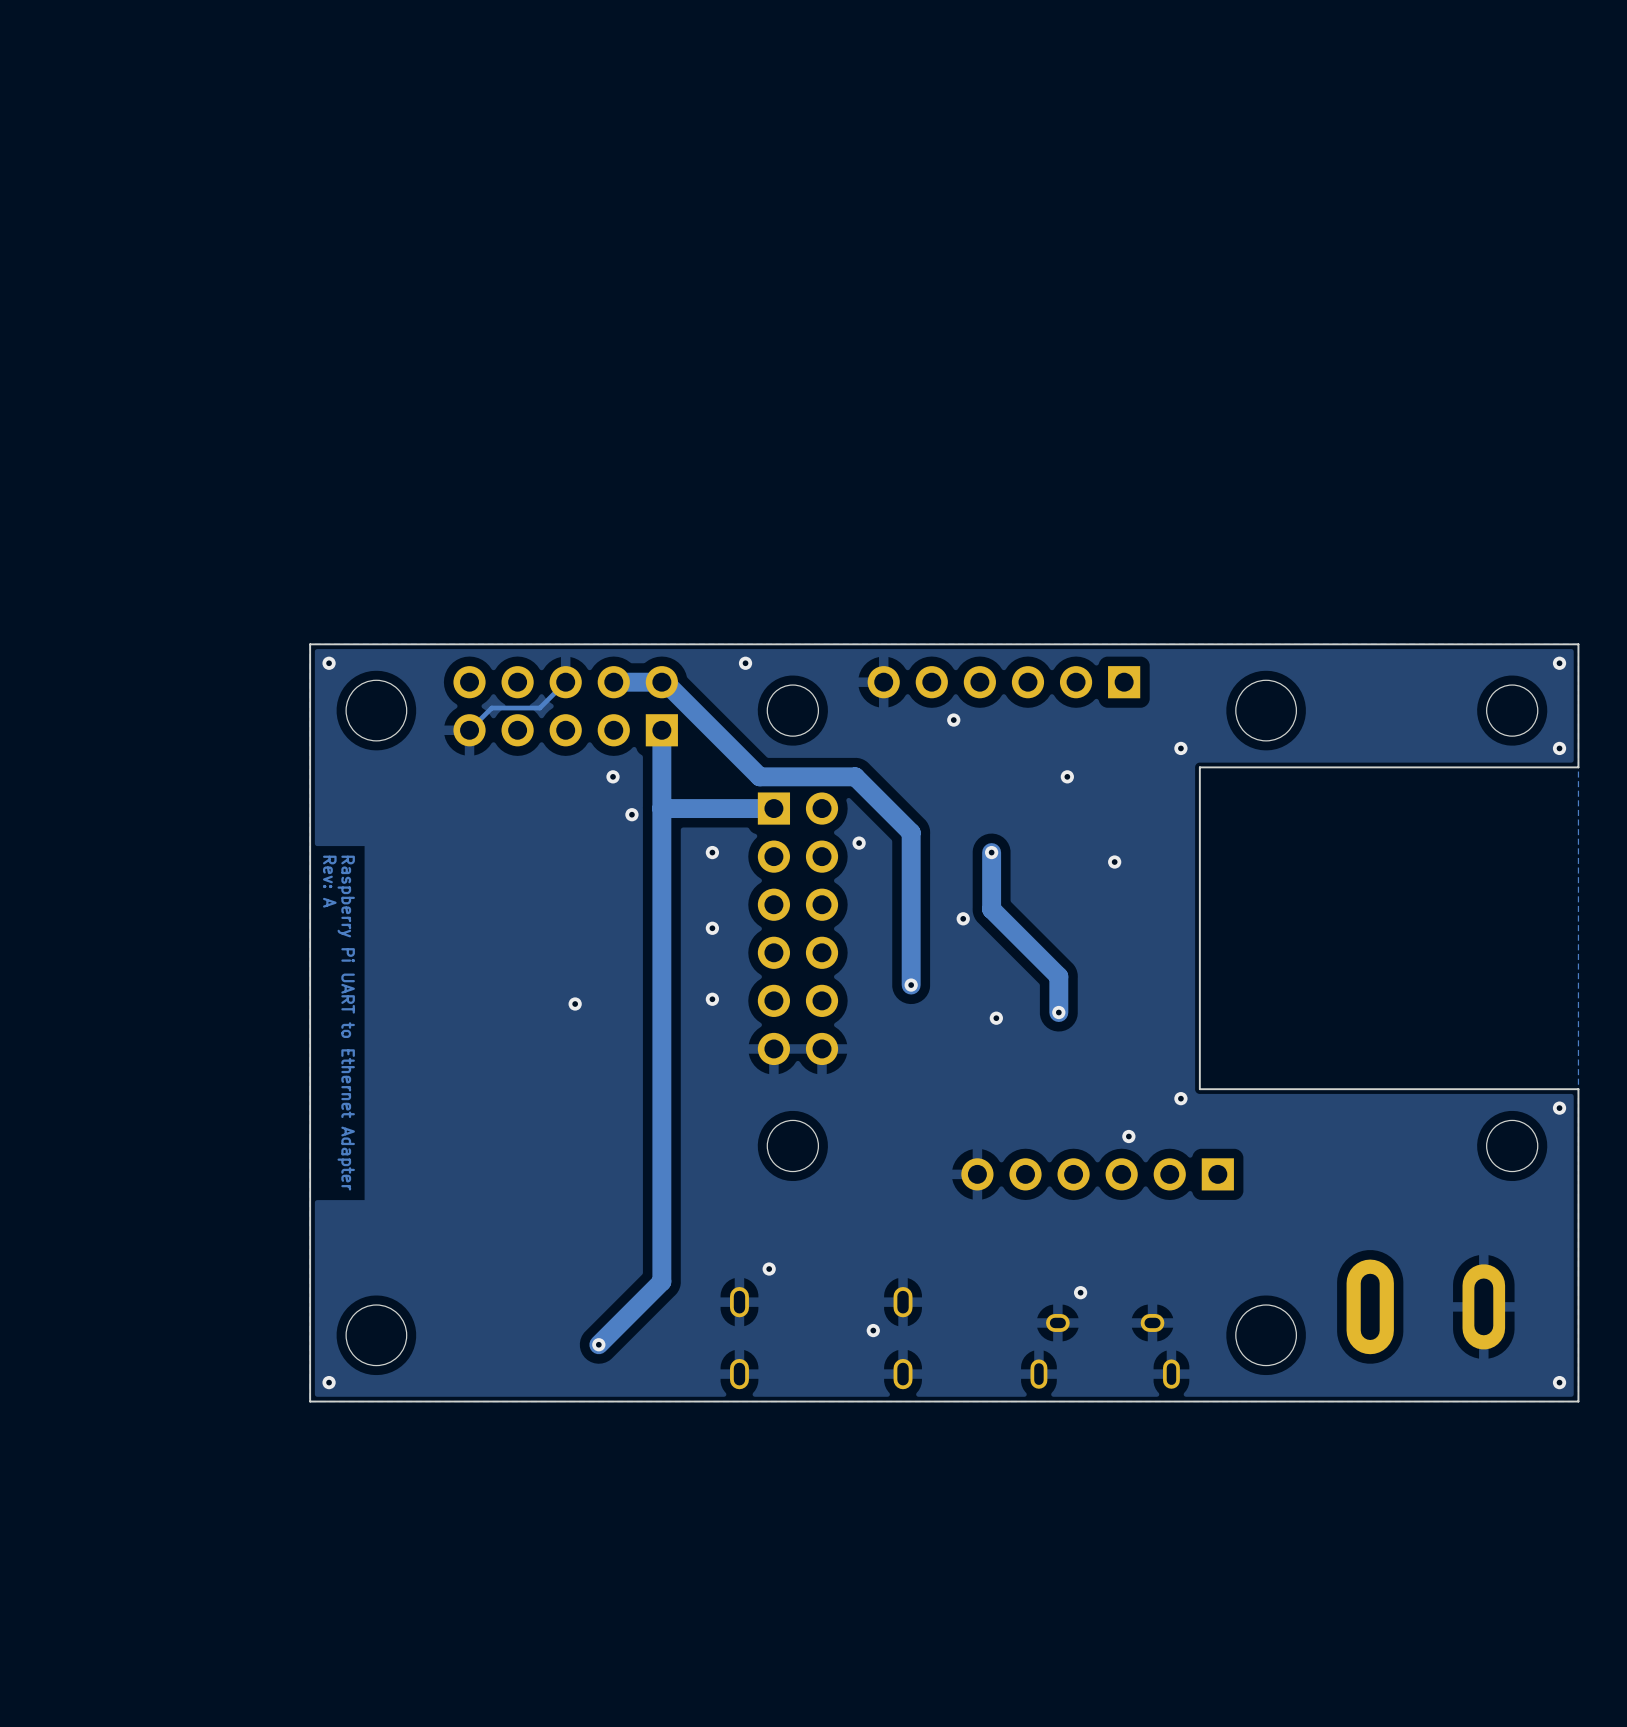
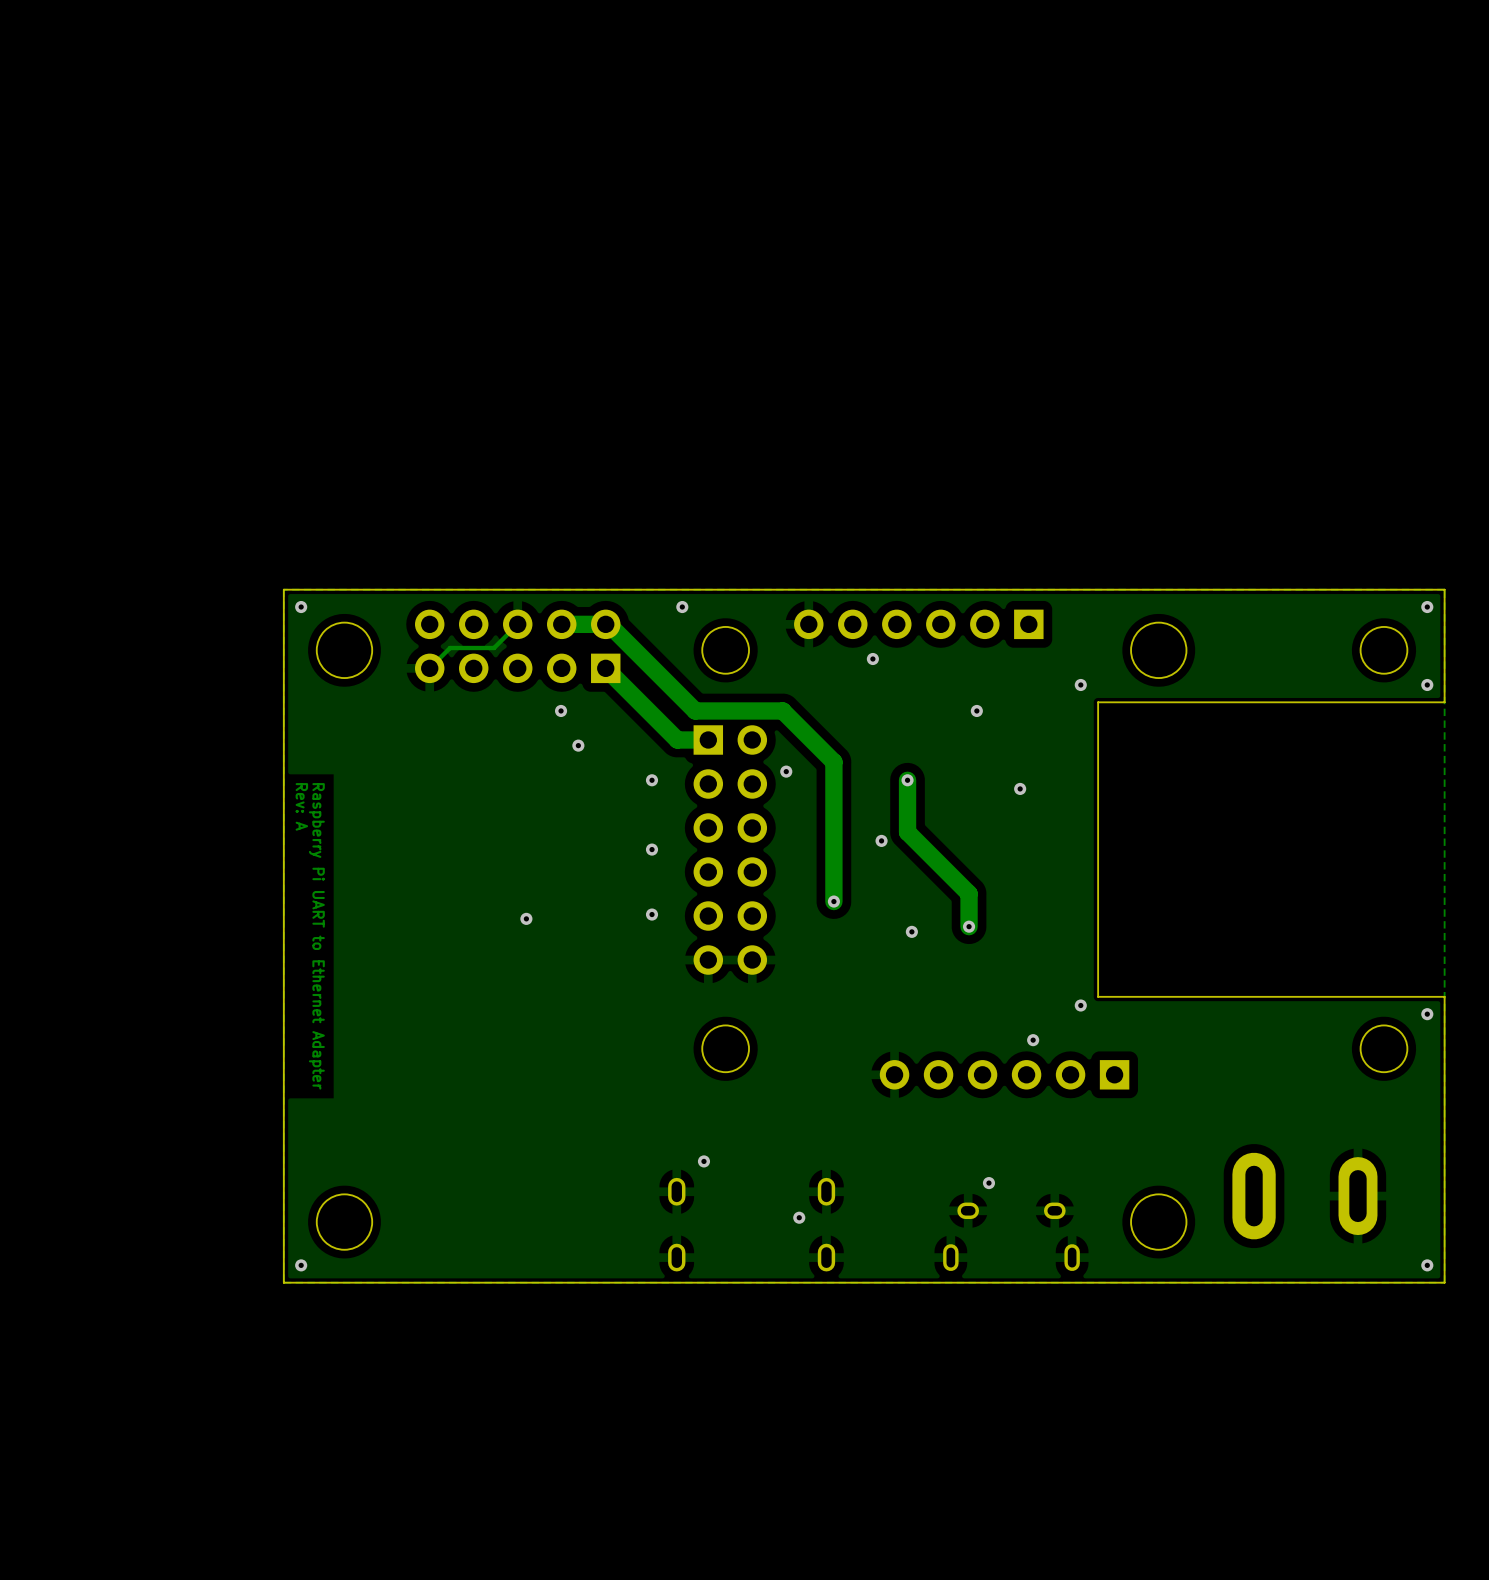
track: (661, 730) (661, 1281) (598, 1344) -> none
track: (740, 808) (661, 808) -> (677, 739) (605, 668)
via: (598, 1344) -> none

